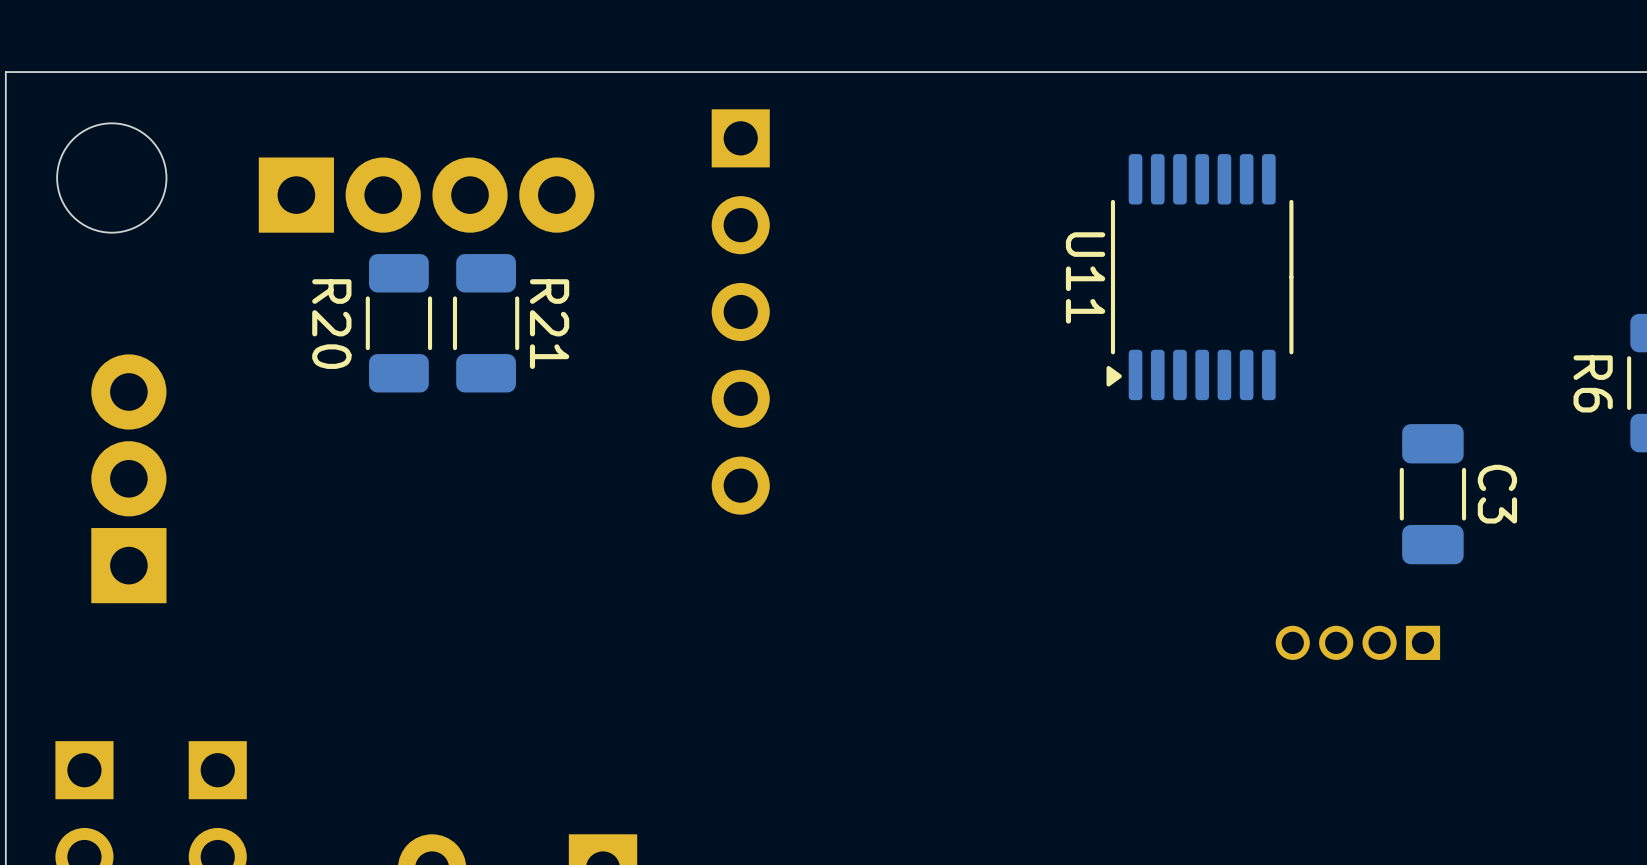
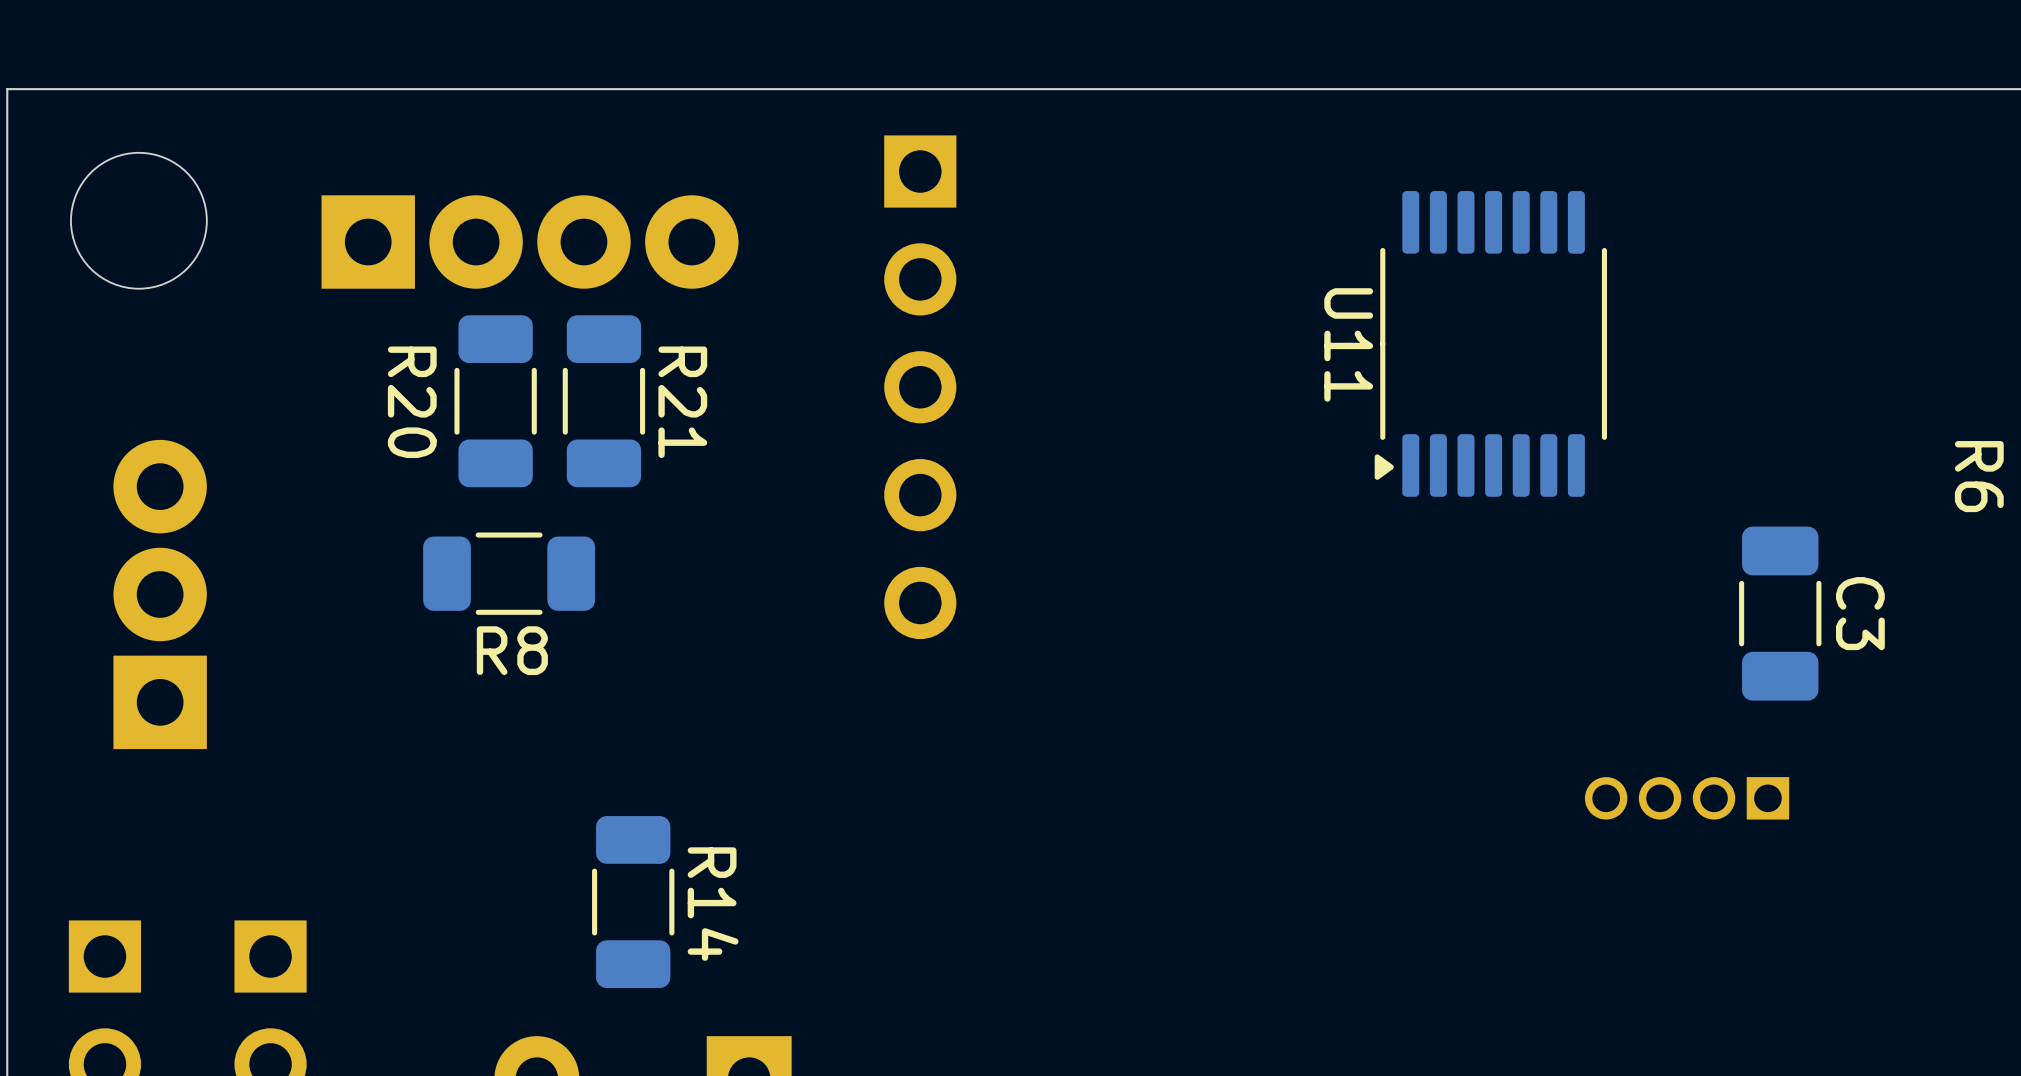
R8: none -> (509, 573)
R14: none -> (633, 902)

